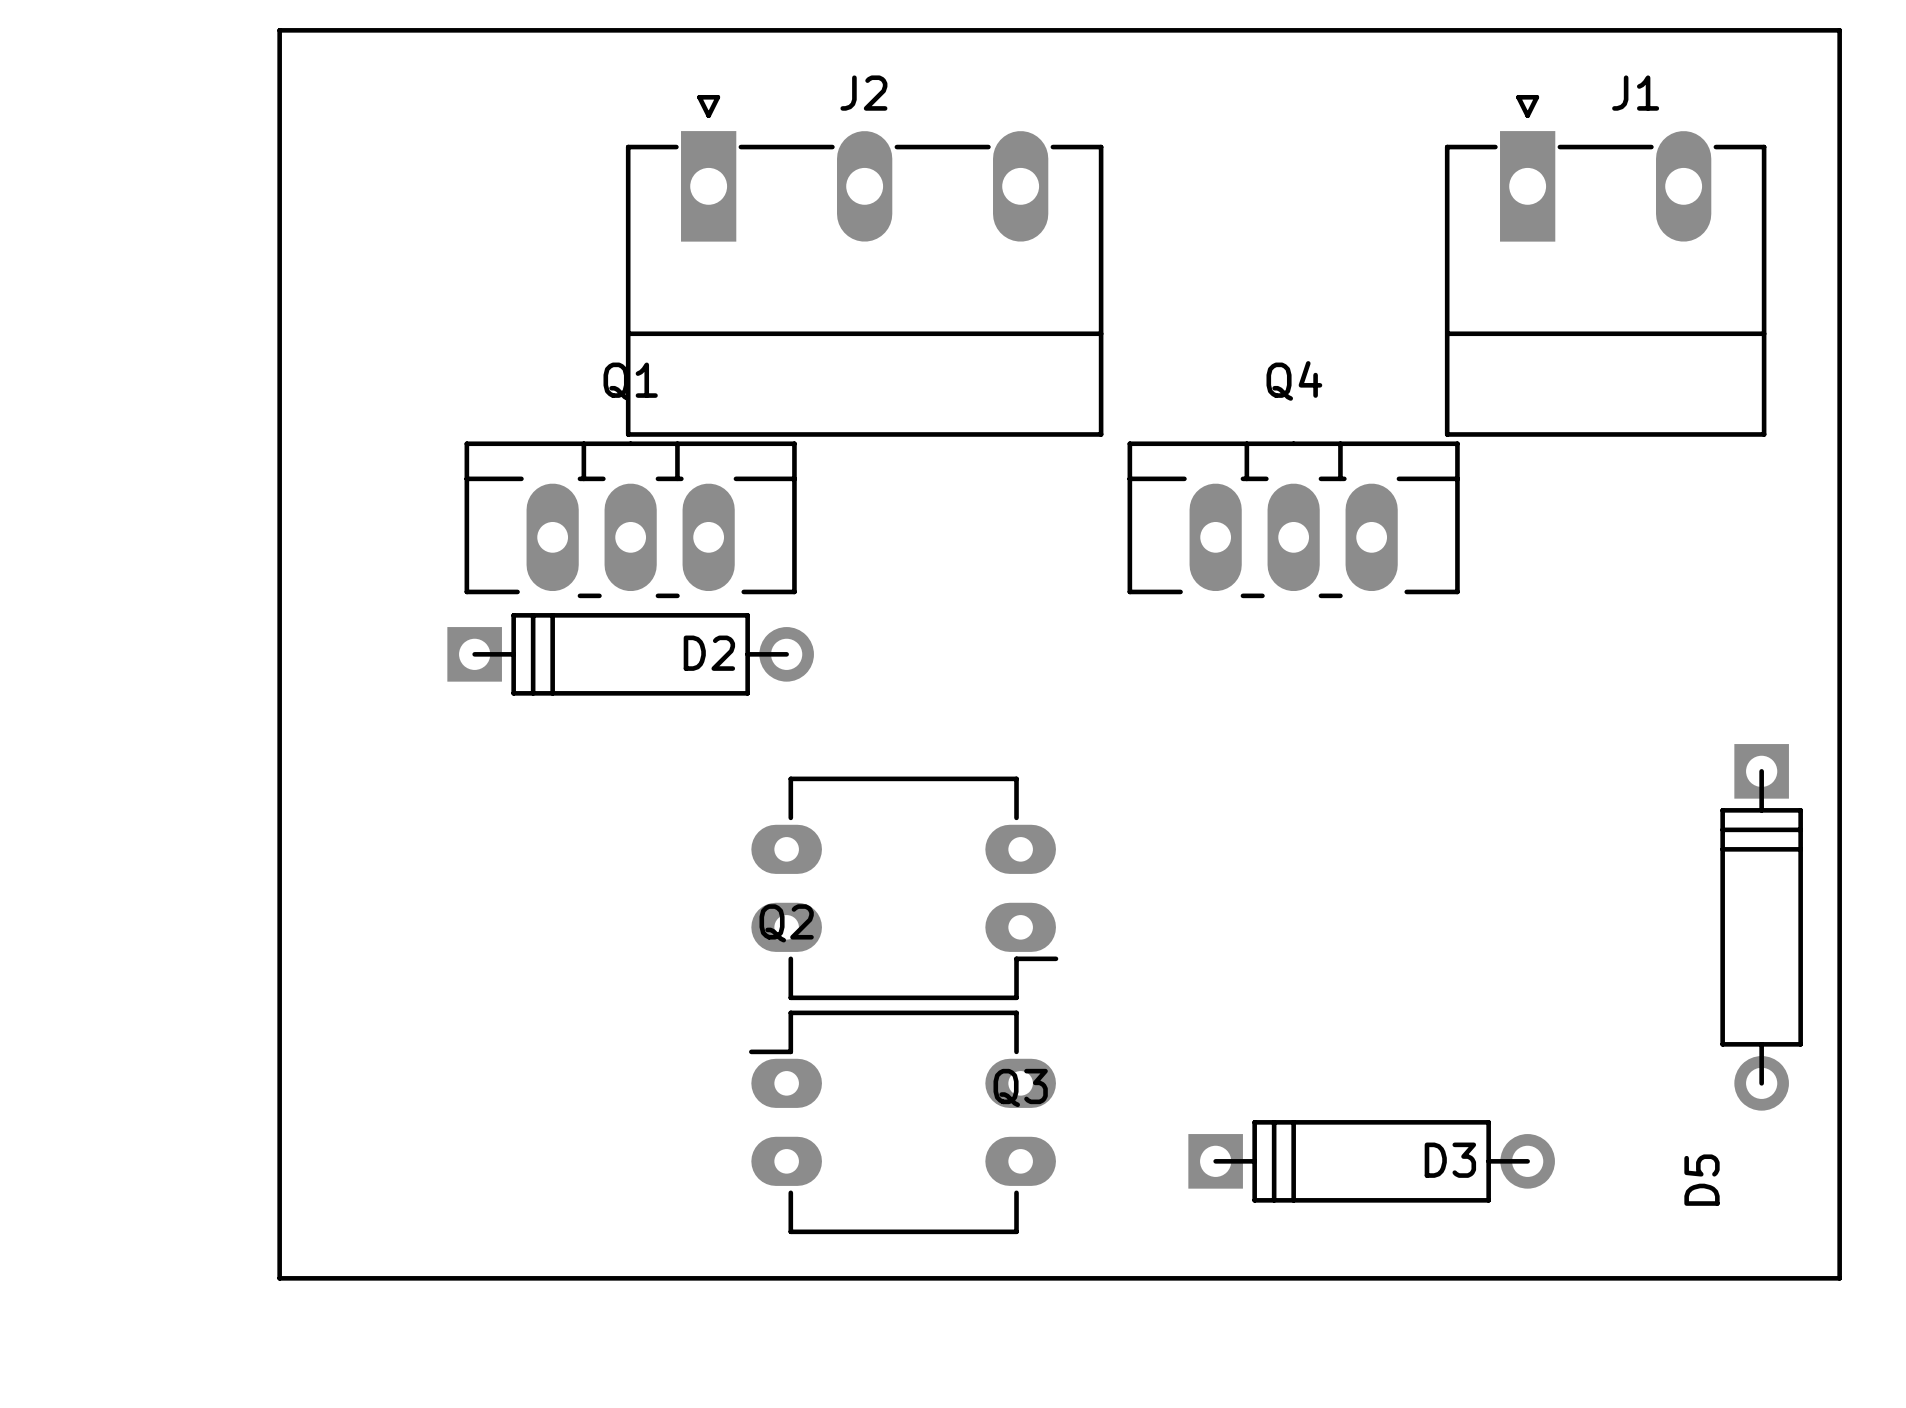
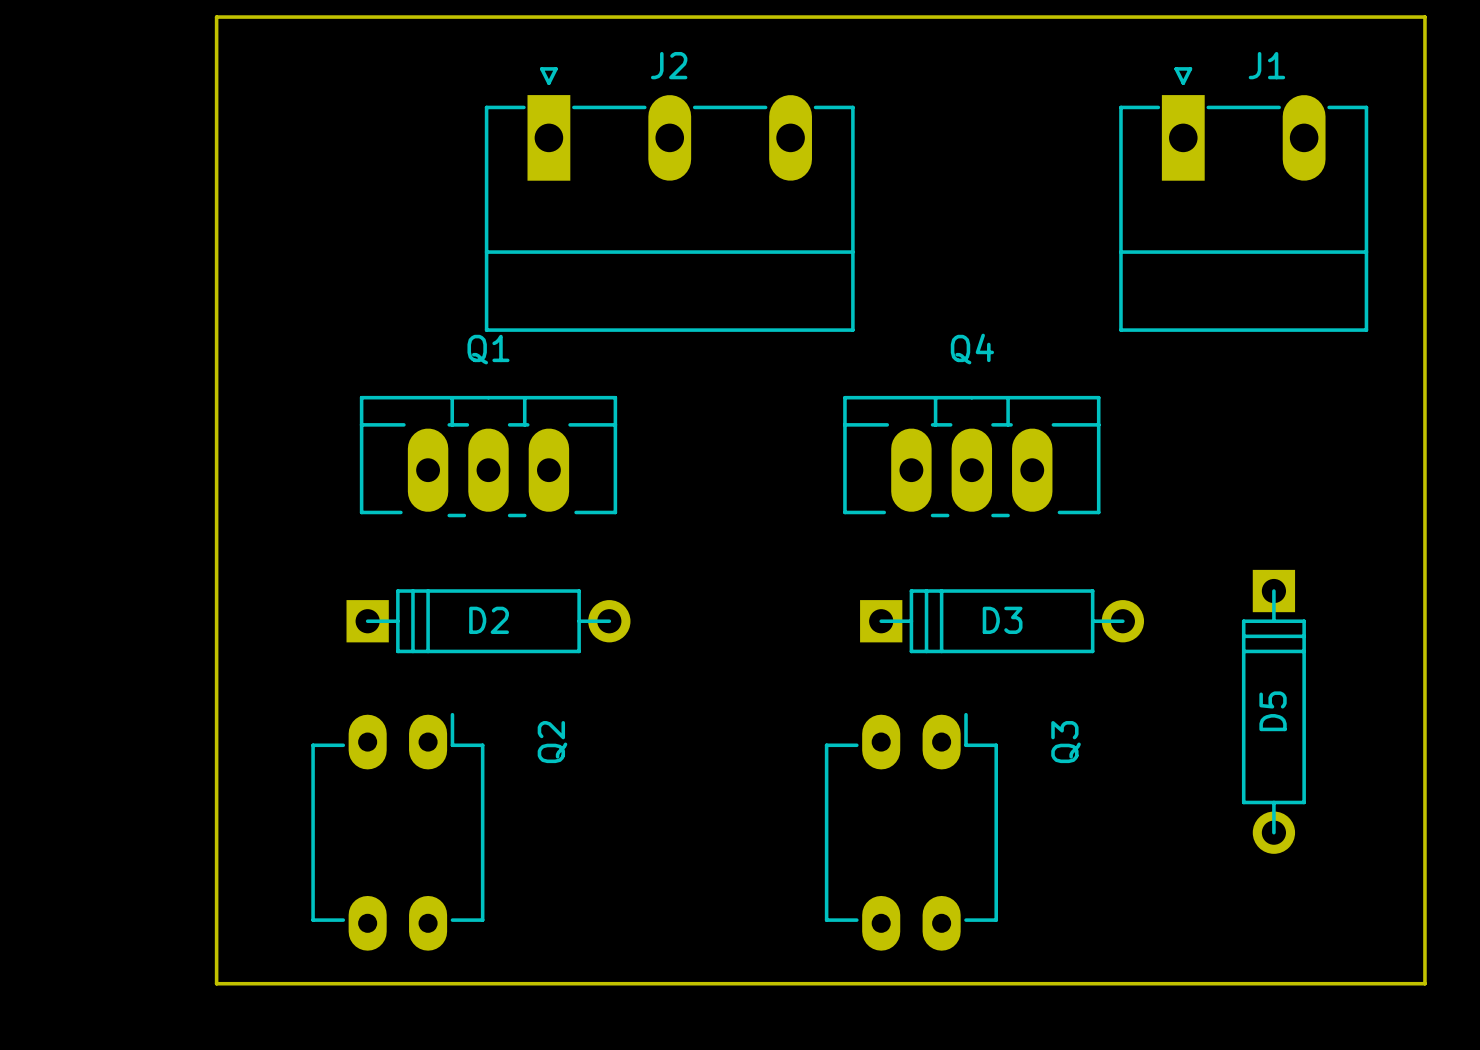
Q1 position: (630, 519) -> (488, 456)
Q4 position: (1293, 519) -> (971, 456)
D2 name position: D2 (709, 653) -> D2 (489, 620)
D2 position: (630, 654) -> (488, 621)
Q3 rotation: 0° (904, 888) -> 90° counterclockwise (911, 831)
Q3 position: (904, 888) -> (911, 831)
D5 position: (1761, 927) -> (1273, 711)
Q2 rotation: 0° (902, 1122) -> 90° clockwise (397, 831)
Q2 position: (902, 1122) -> (397, 831)
D3 name position: D3 (1450, 1160) -> D3 (1002, 620)
D3 position: (1371, 1161) -> (1002, 621)
D5 name position: D5 (1702, 1180) -> D5 (1273, 711)

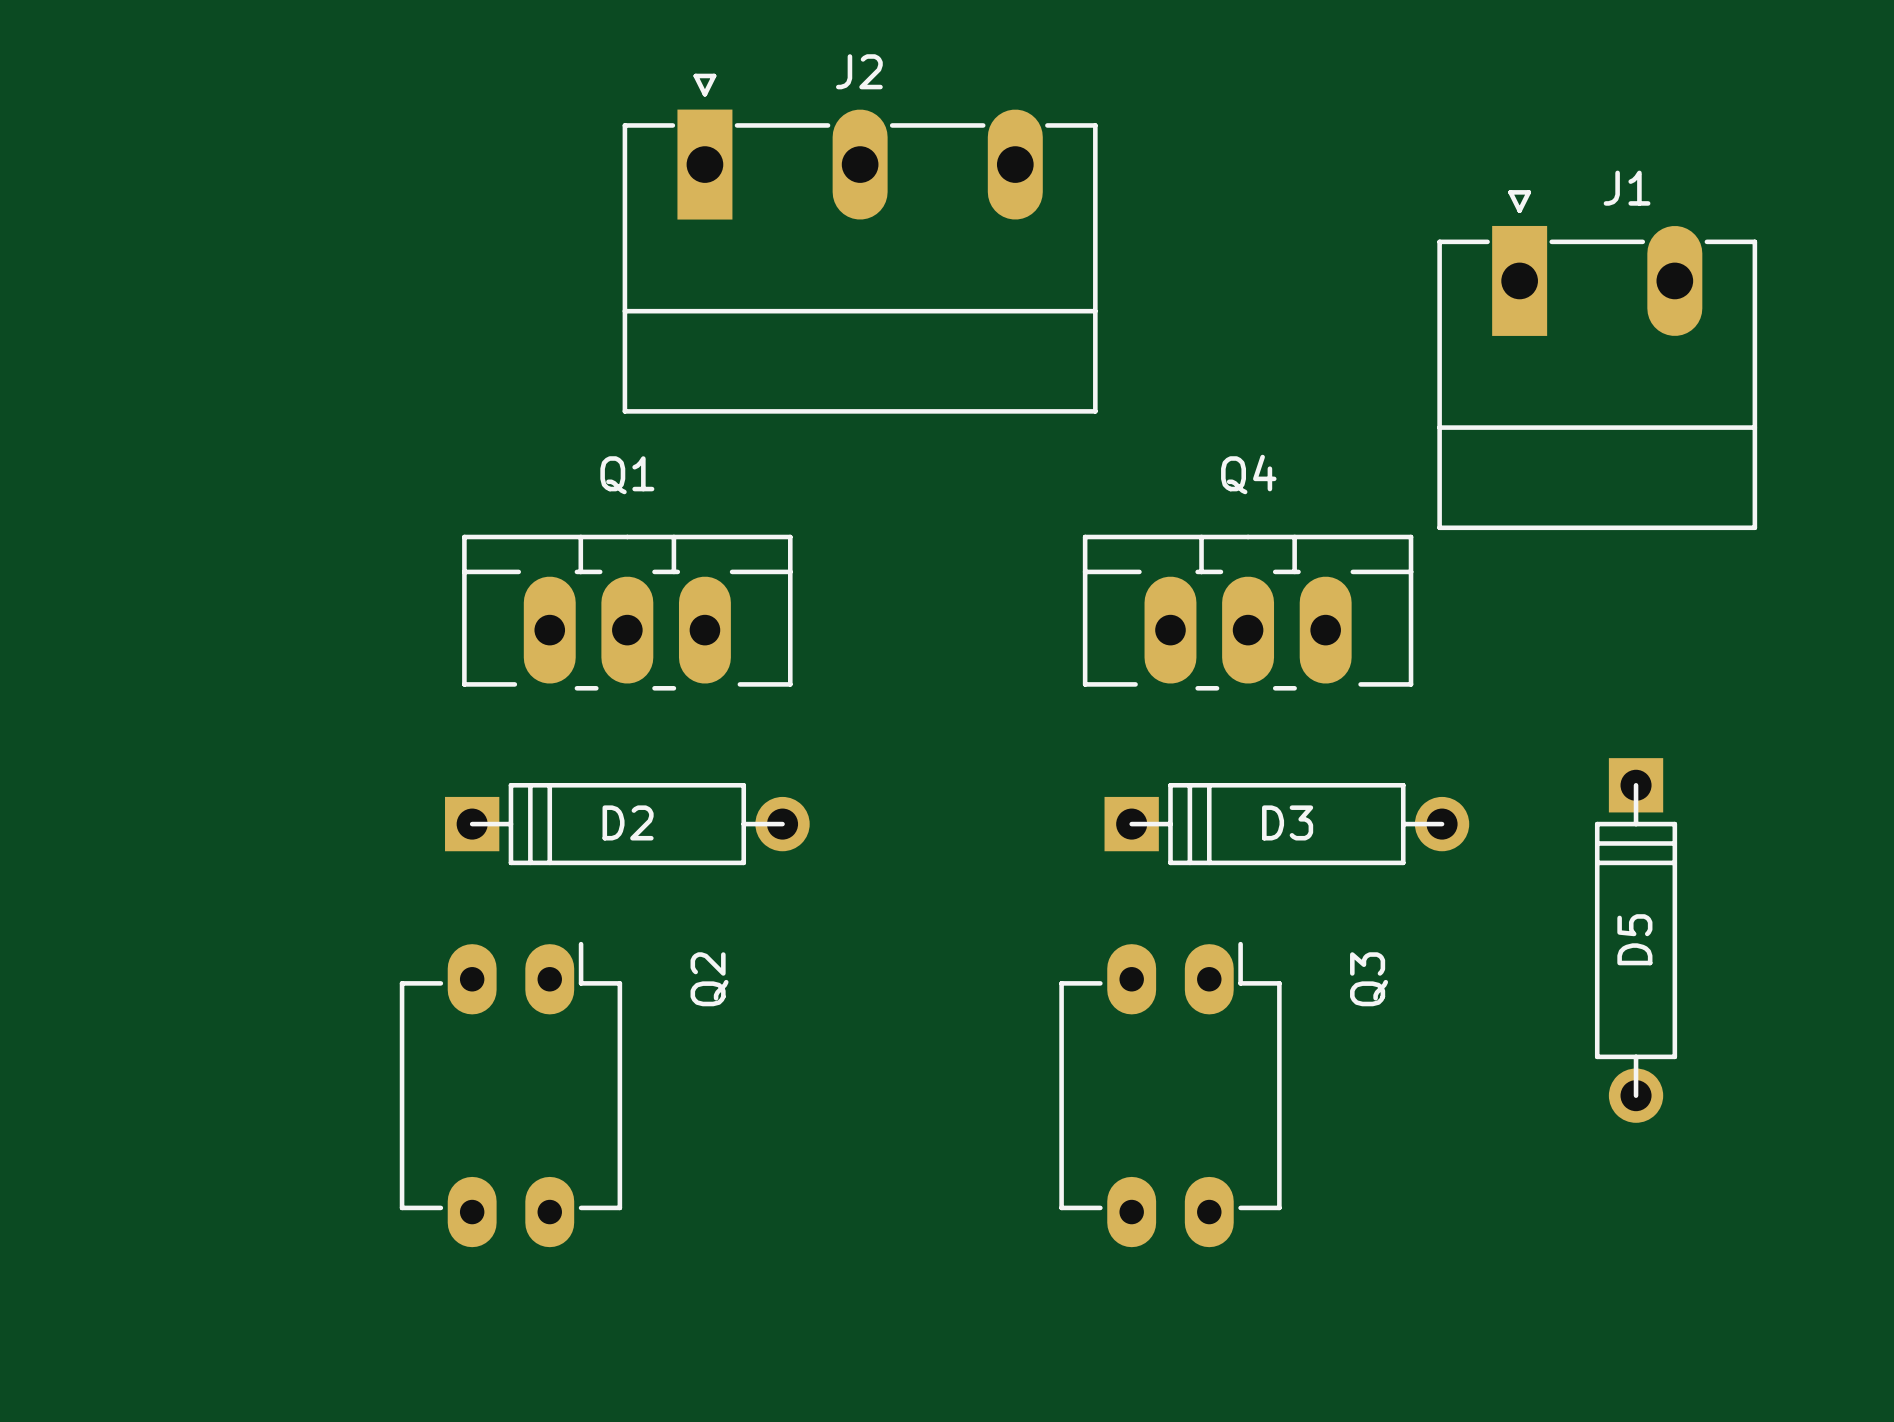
board edge: (216, 17) (216, 983) (1424, 983) (1424, 17) (216, 17) -> none
J2 position: (669, 199) -> (860, 243)
J1 position: (1243, 199) -> (1597, 360)

